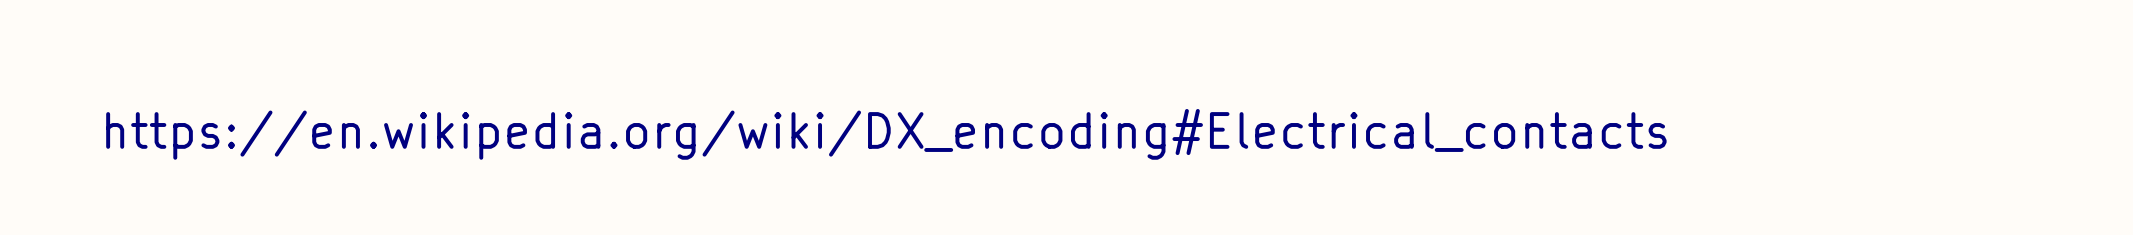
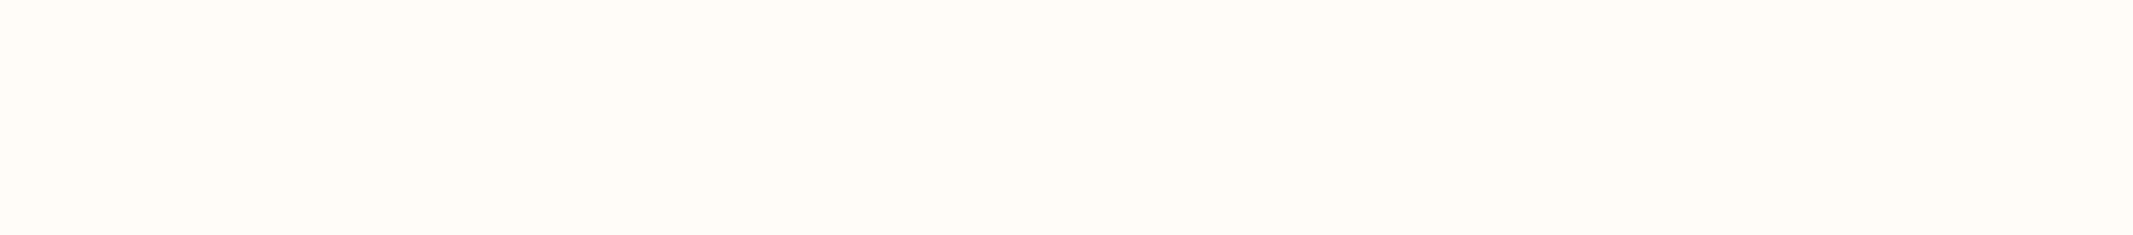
text: https://en.wikipedia.org/wiki/DX_encoding#Electrical_contacts (886, 134) -> none

